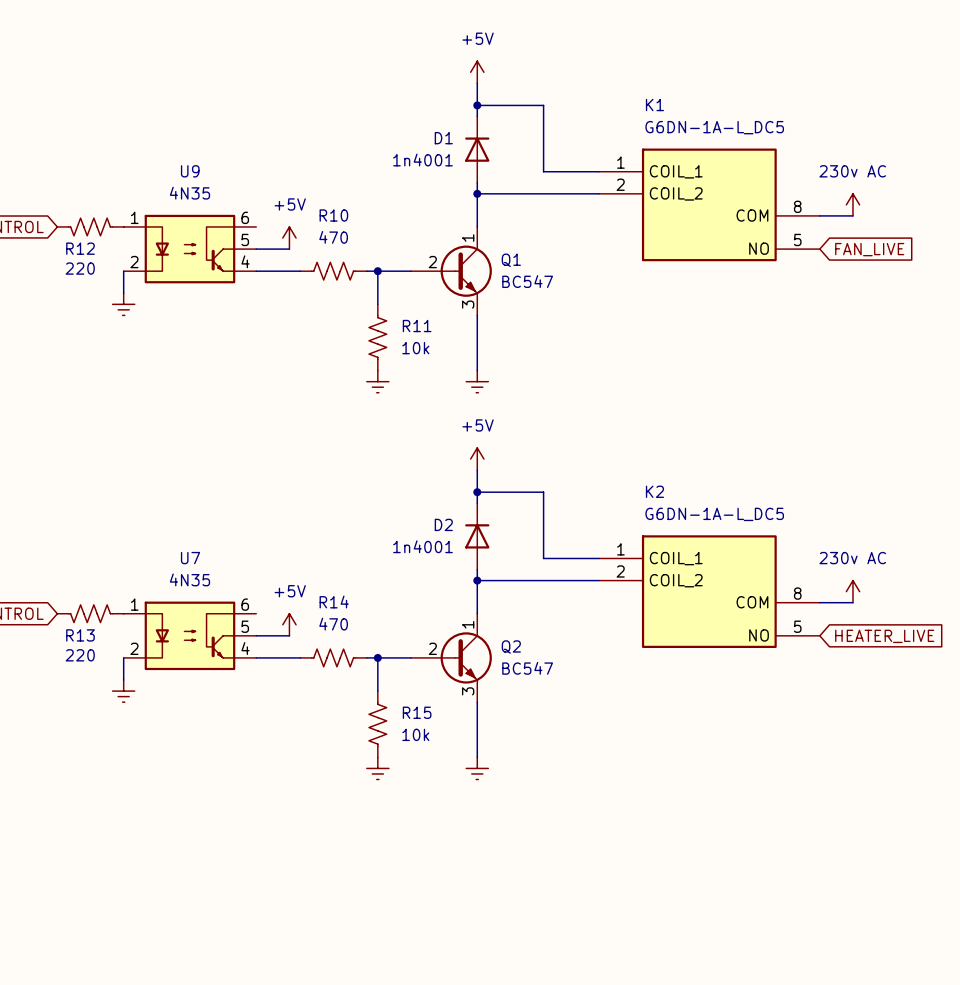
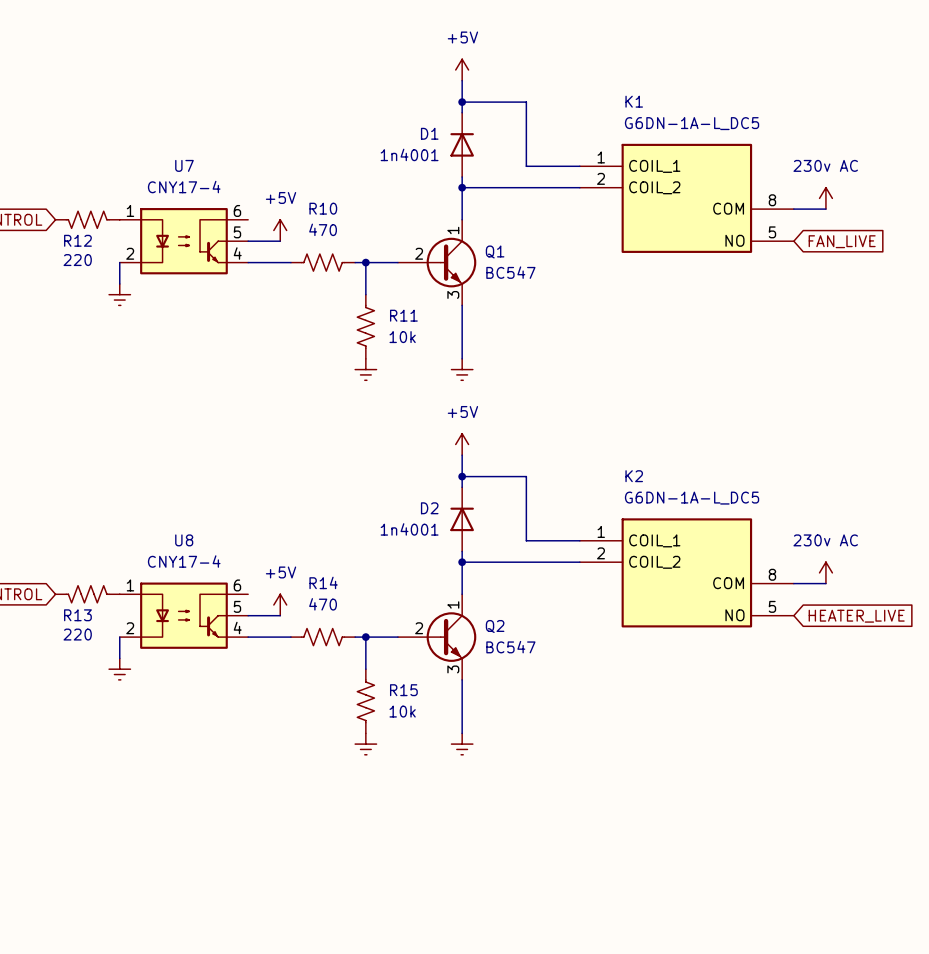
U9: 4N35 (189, 249) -> none
U7 value: 4N35 (189, 579) -> CNY17-4 (184, 187)
U7 symbol: [123, 601, 257, 671] -> [119, 208, 249, 275]
U8: none -> CNY17-4 (183, 615)

